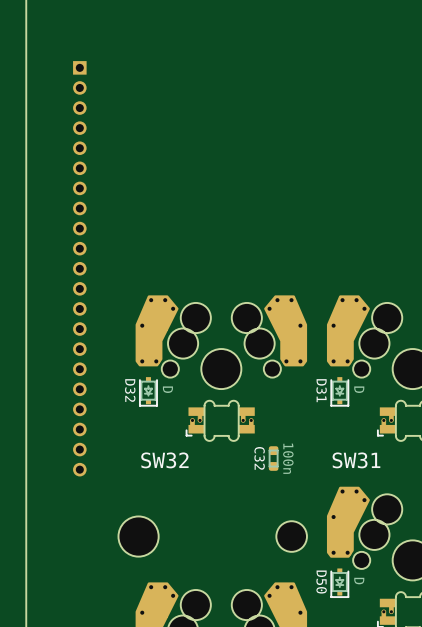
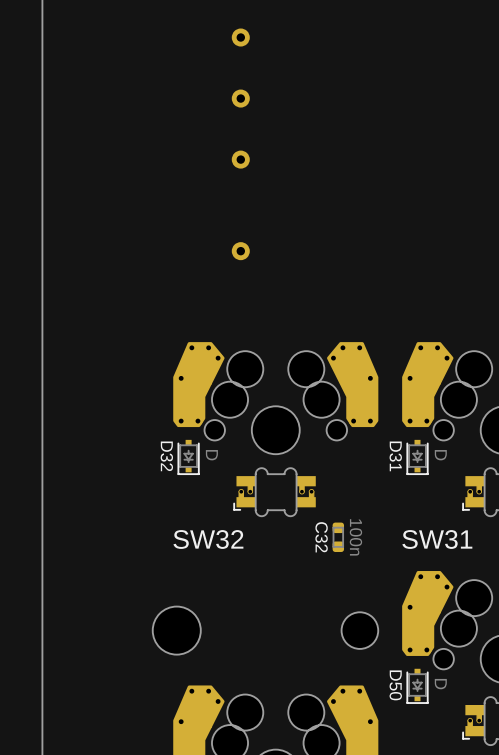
part: none -> (240, 37)
part: none -> (240, 98)
part: none -> (240, 159)
part: none -> (240, 251)
part: (79, 268) -> none

